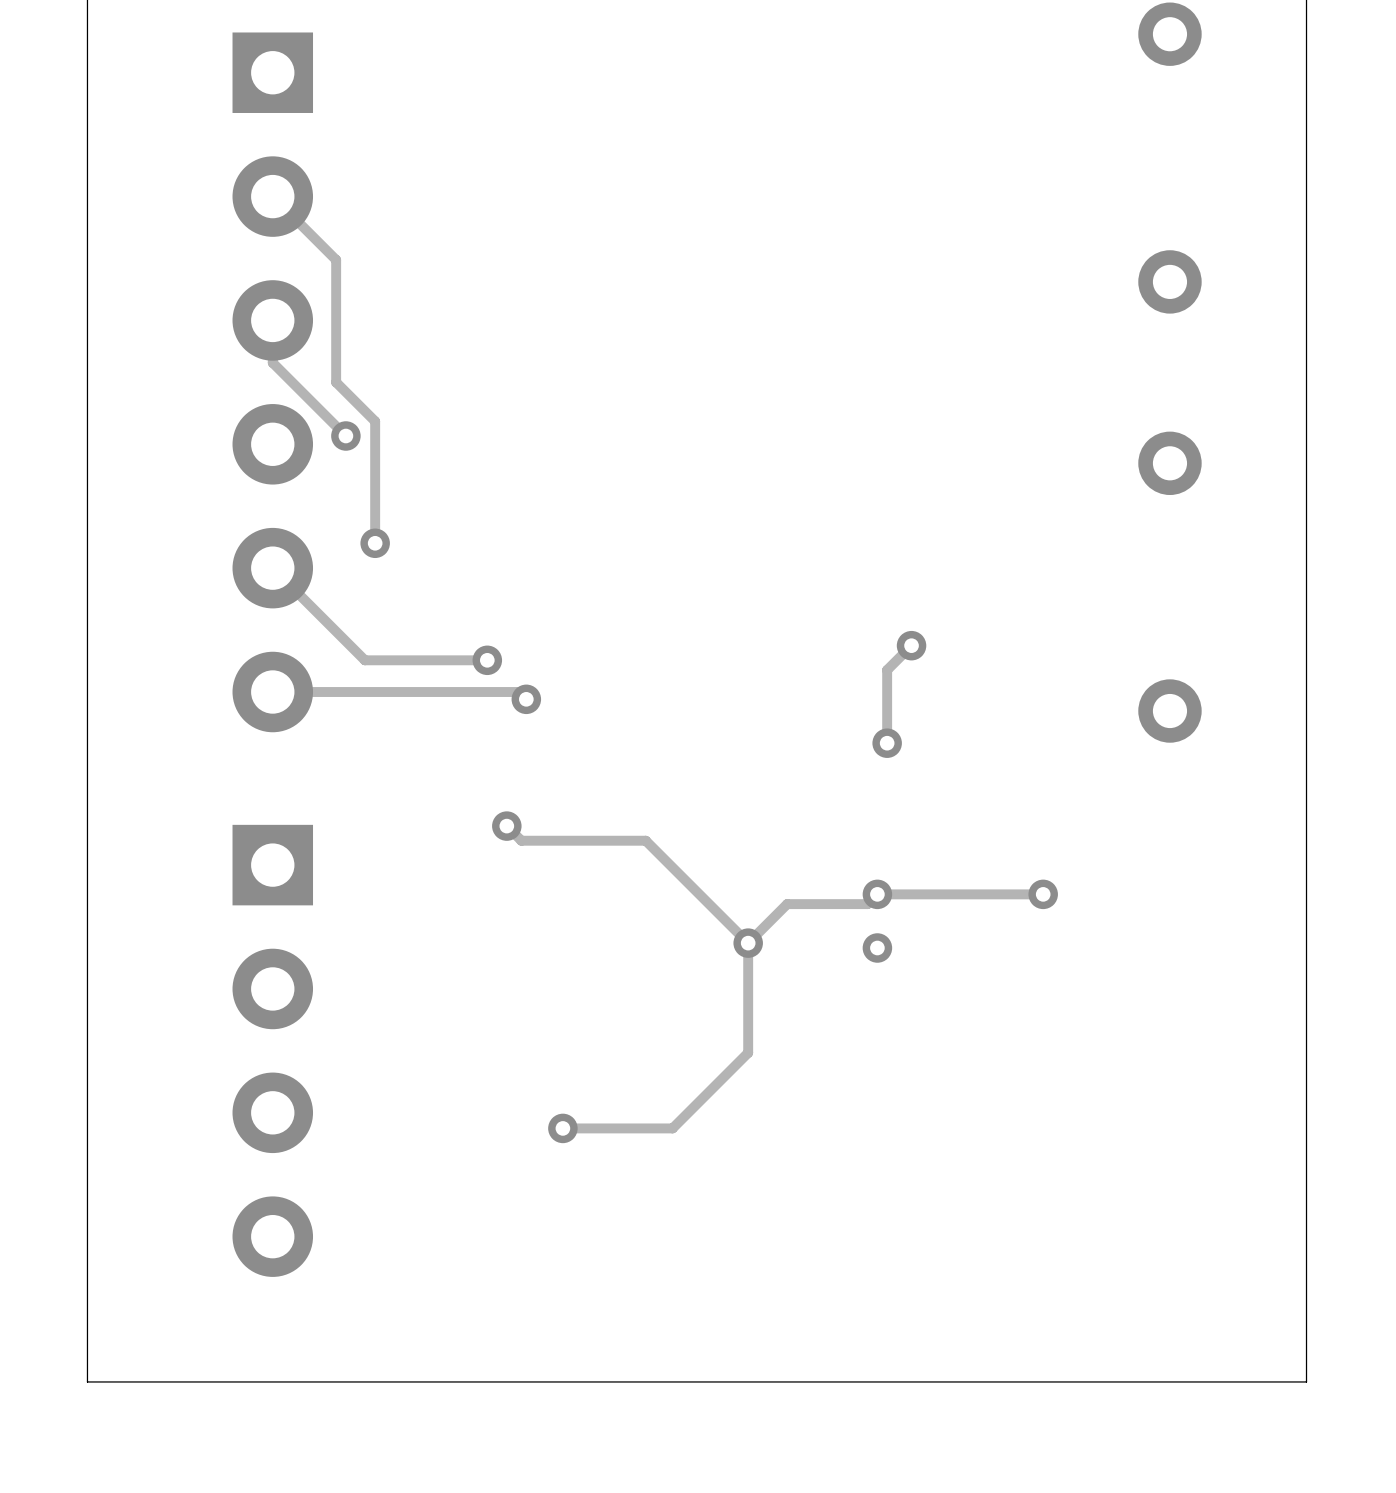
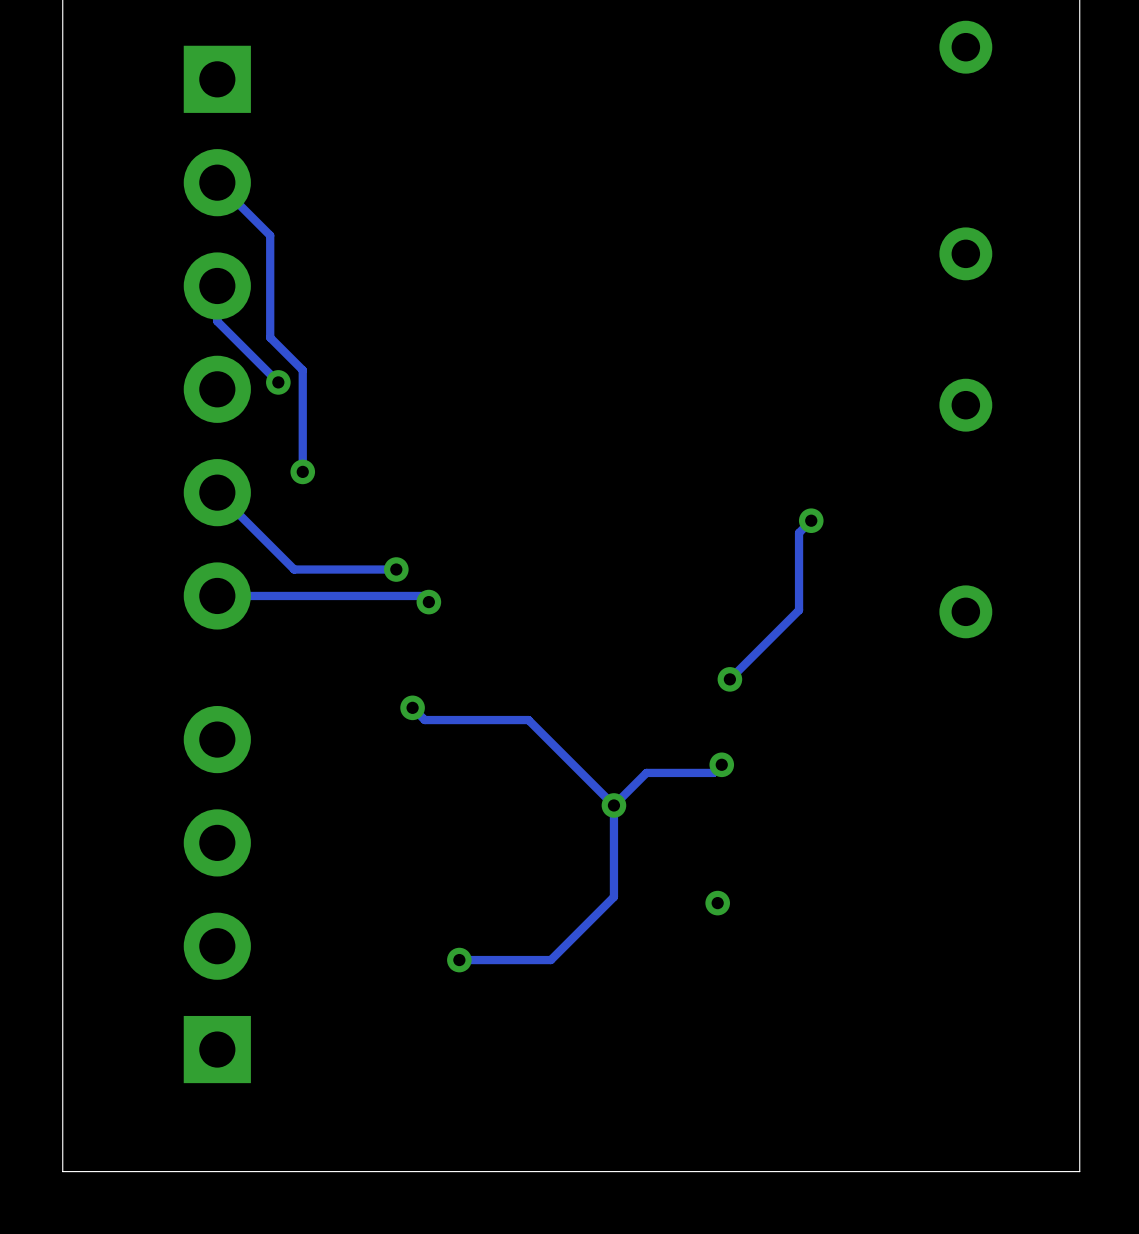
track: none -> (811, 520) (799, 532) (799, 610) (729, 679)
via: none -> (811, 520)
track: (911, 645) (887, 670) (887, 743) -> none
via: (911, 645) -> none
via position: (887, 743) -> (729, 679)
track: (1043, 894) (877, 894) -> none
via: (1043, 894) -> none
via: (877, 948) -> none
part rotation: 0° (272, 1050) -> 180° (217, 894)
via: none -> (717, 903)

